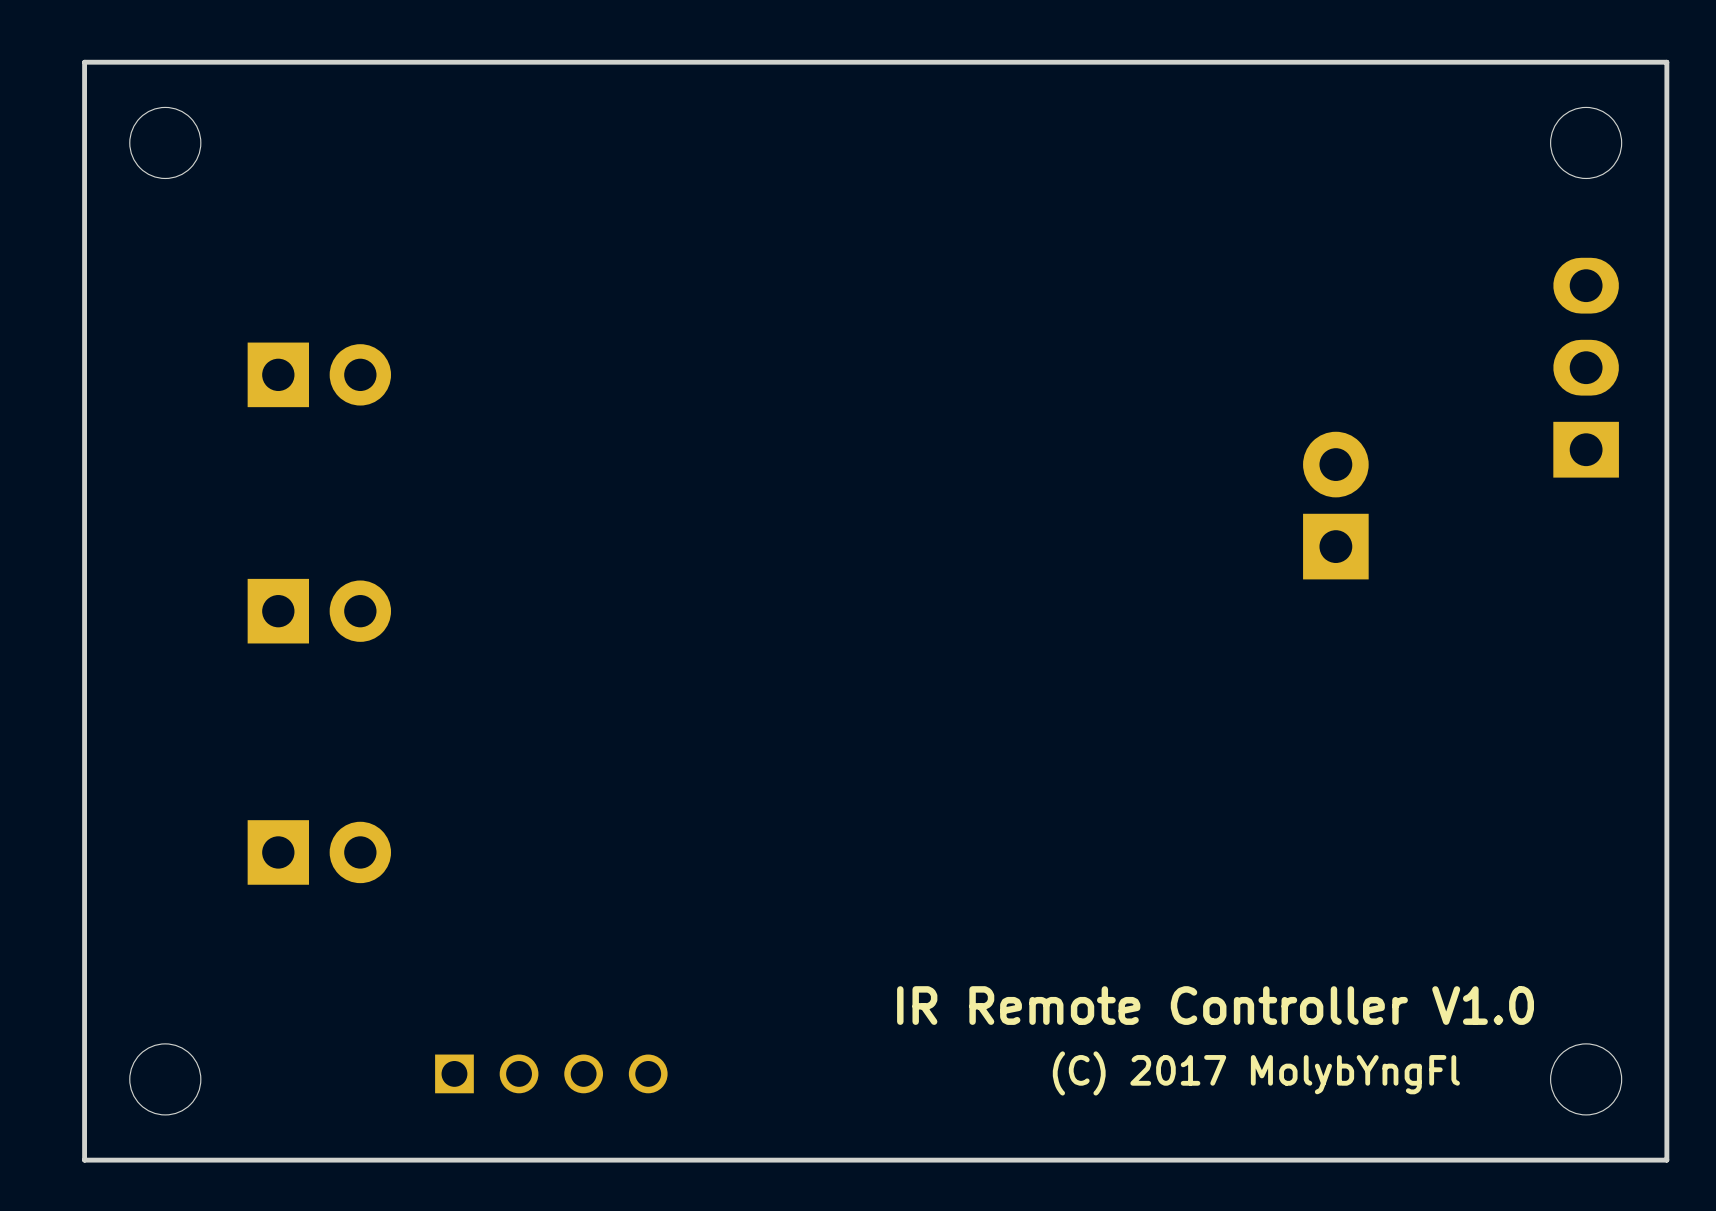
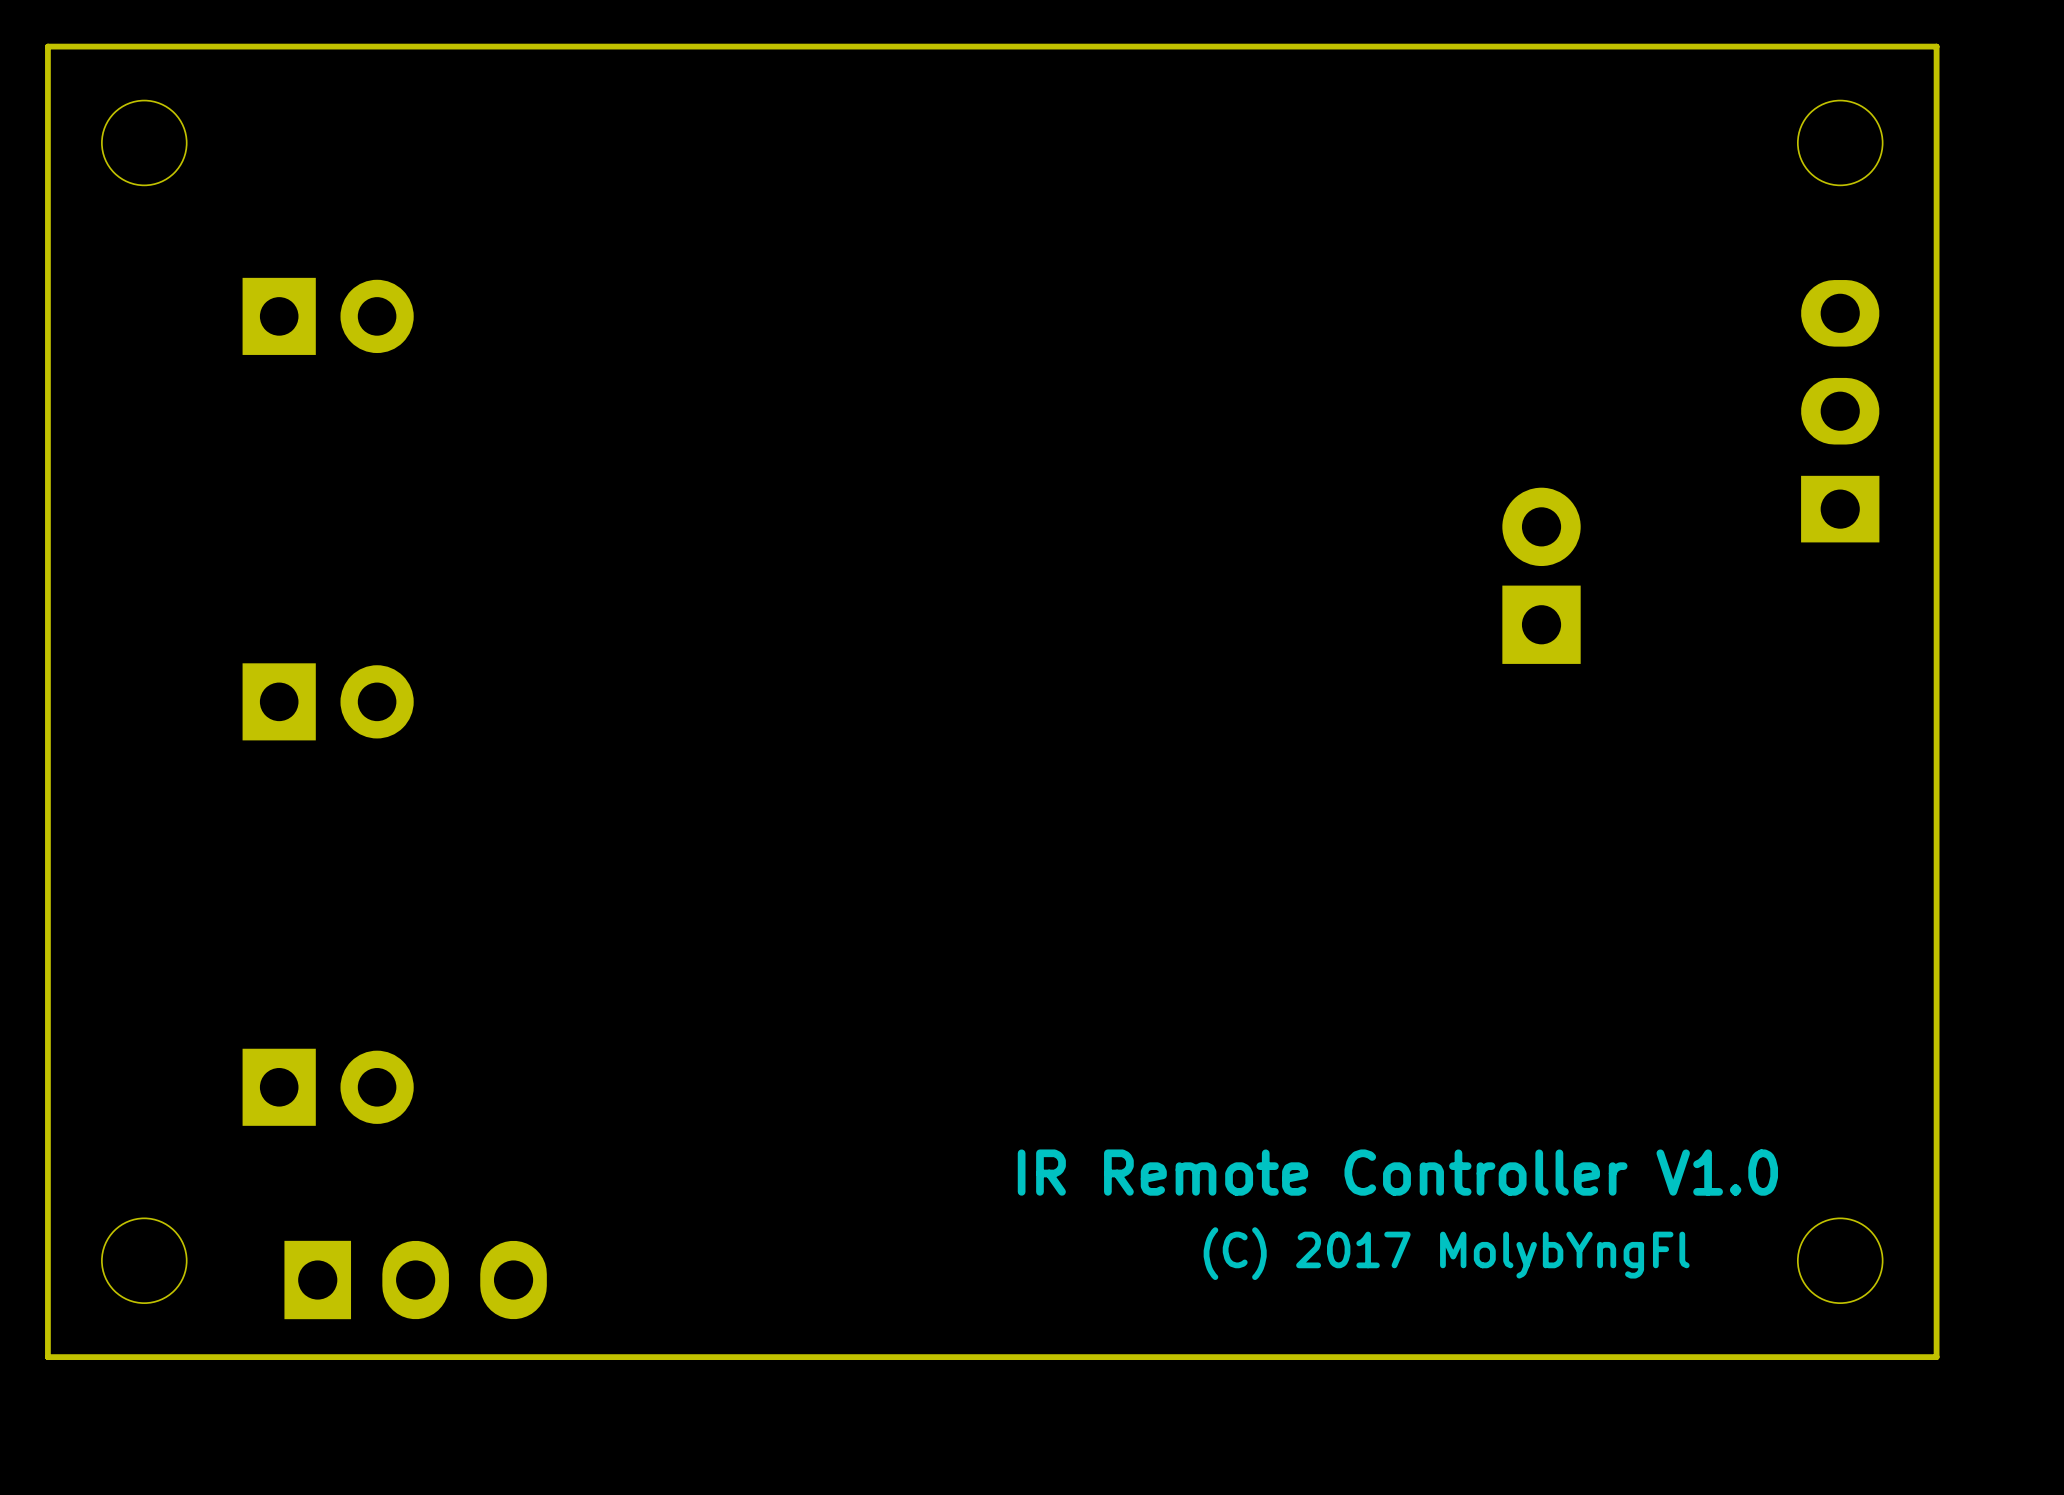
part position: (319, 374) -> (328, 316)
part position: (319, 852) -> (328, 1087)
part: (551, 1073) -> none
part: none -> (415, 1280)

